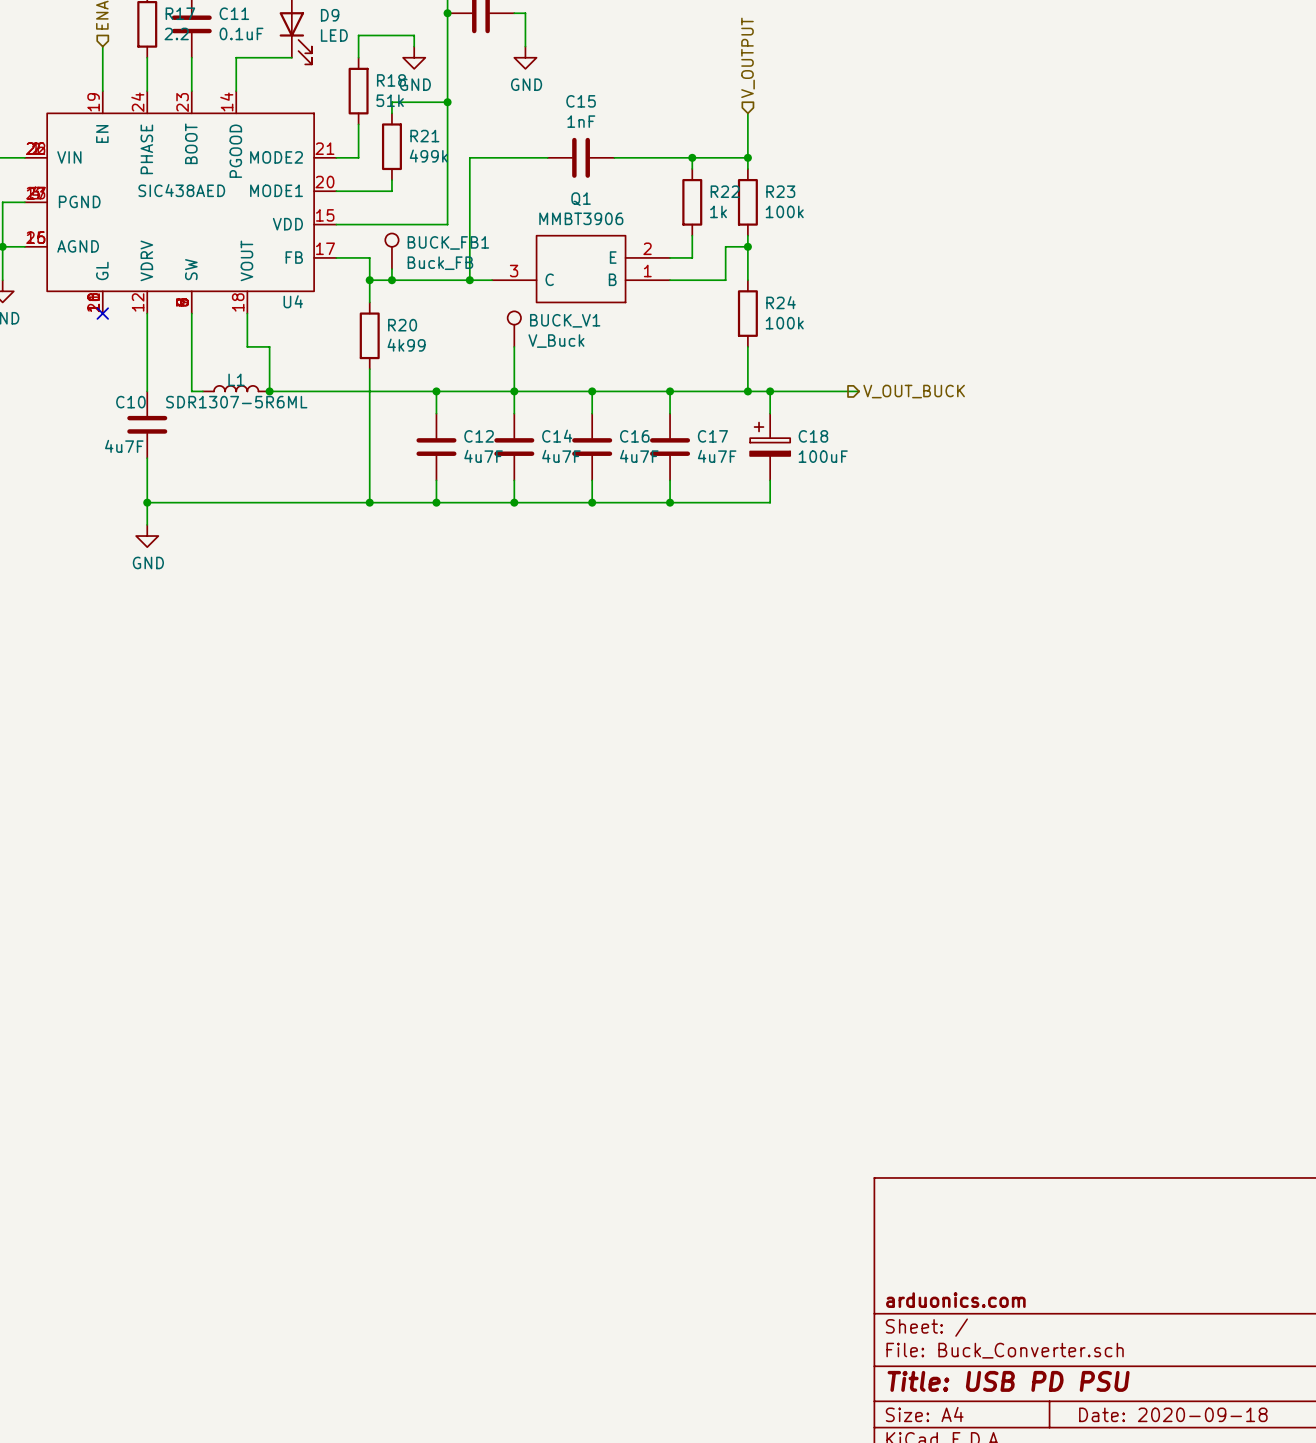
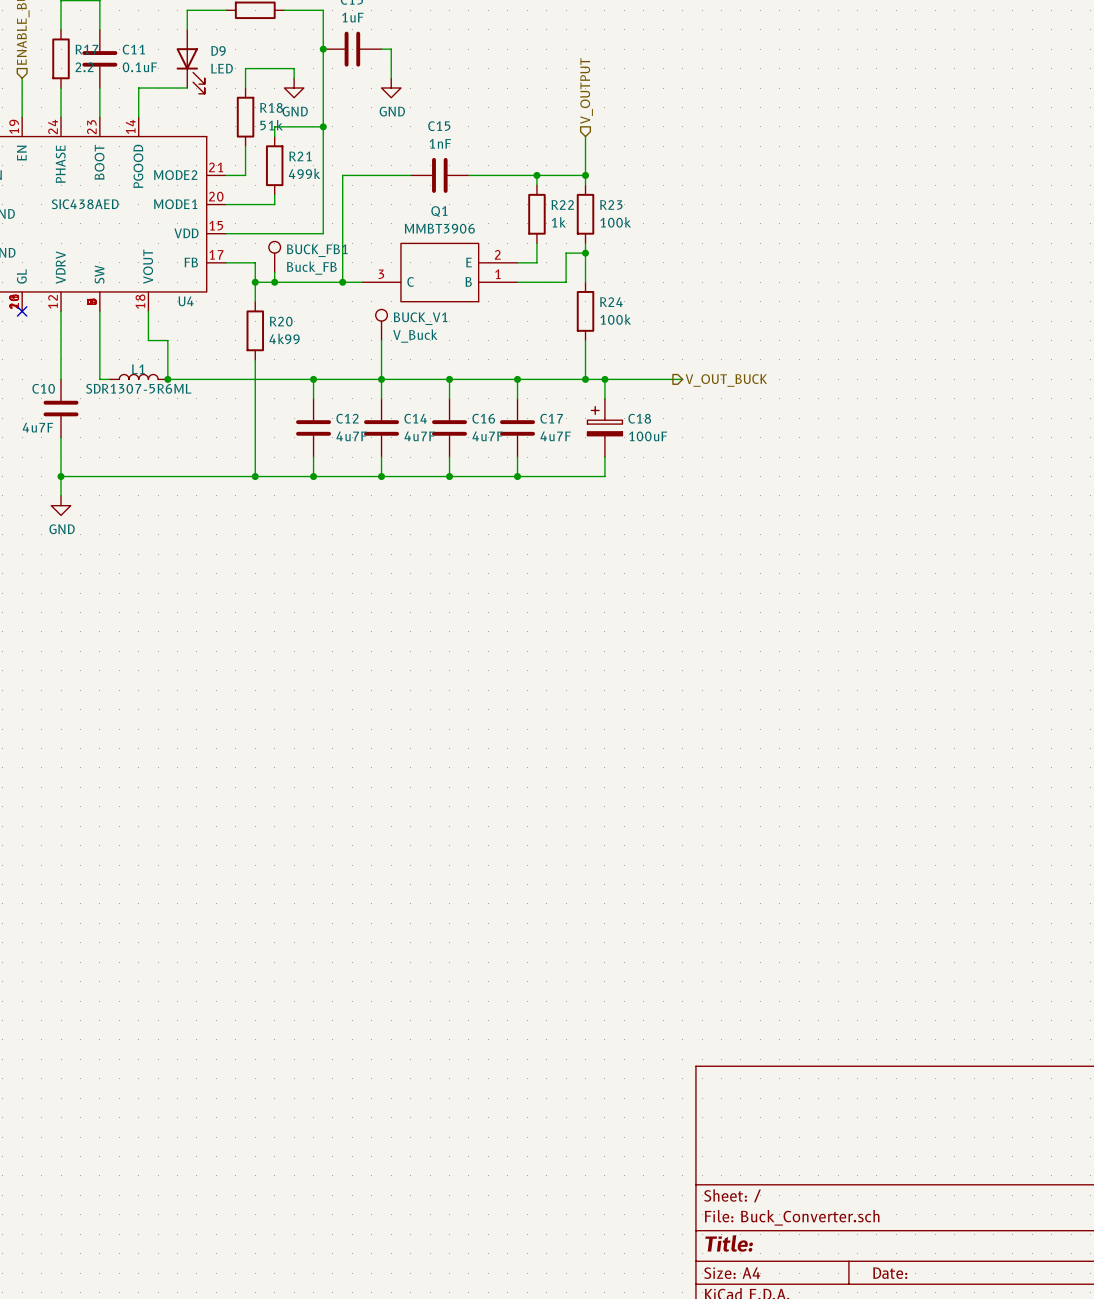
title block: arduonics.com (955, 1300) -> none
title block: Title: USB PD PSU (1008, 1381) -> Title: (729, 1243)
title block: Date: 2020-09-18 (1173, 1414) -> Date: (890, 1273)

